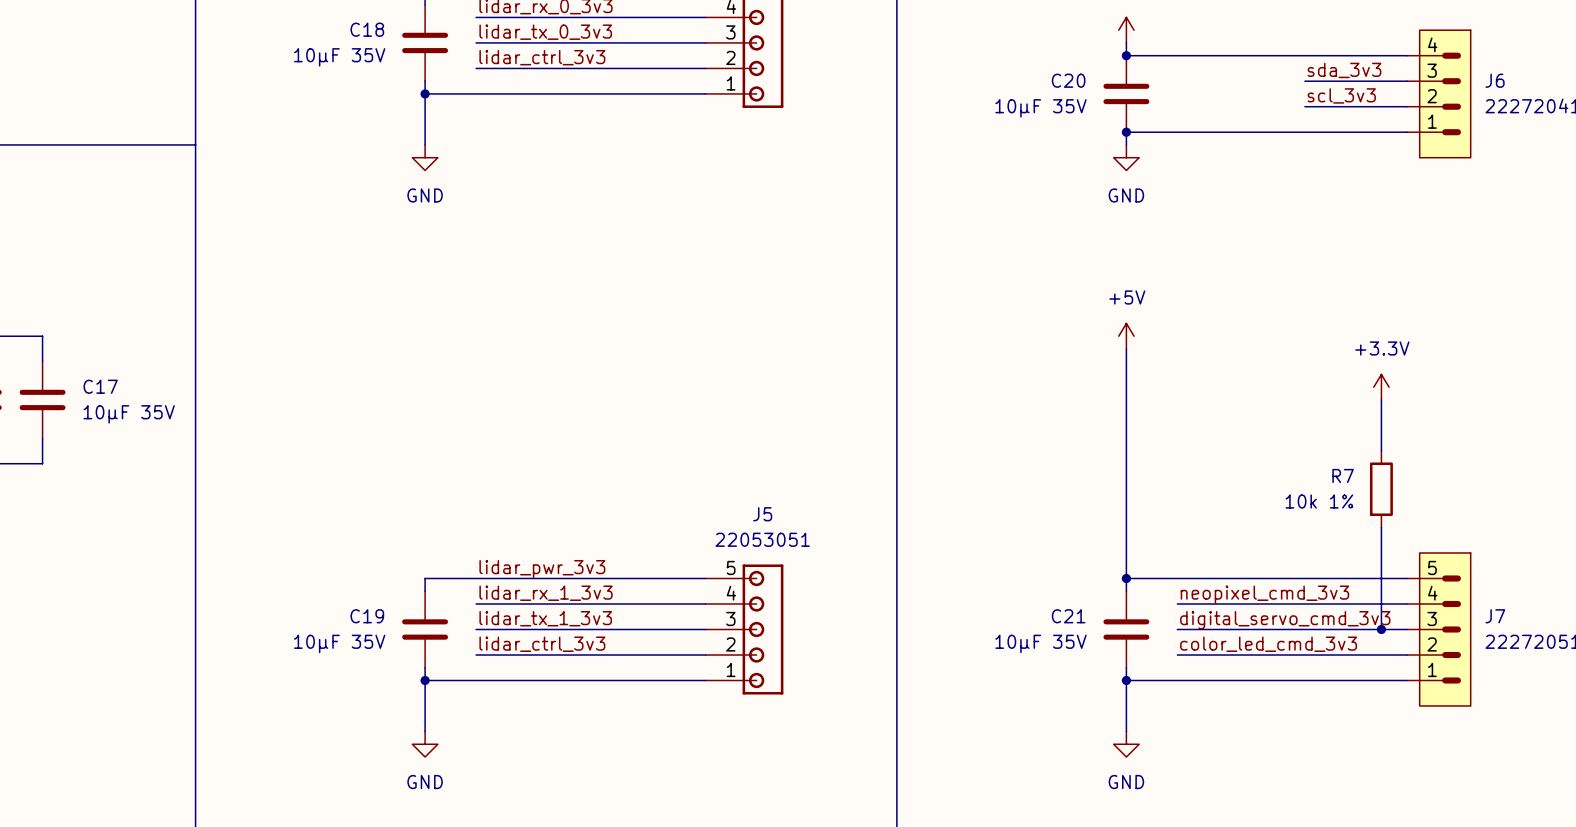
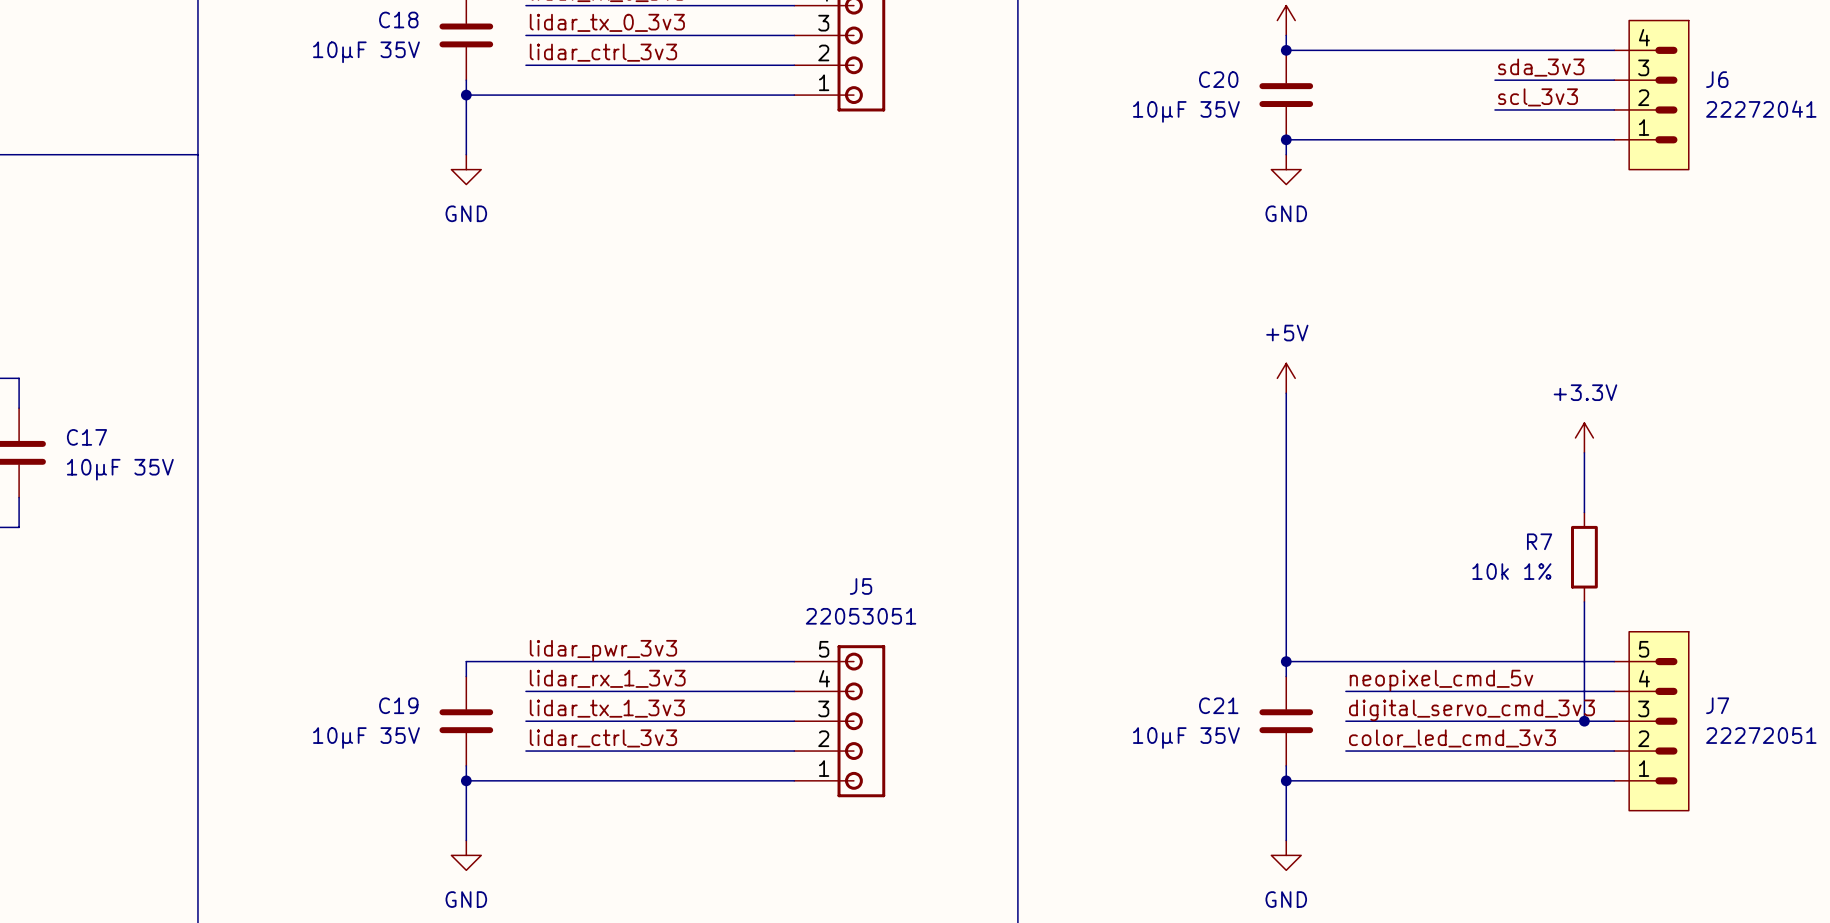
label: neopixel_cmd_3v3 (1264, 594) -> neopixel_cmd_5v (1441, 680)

